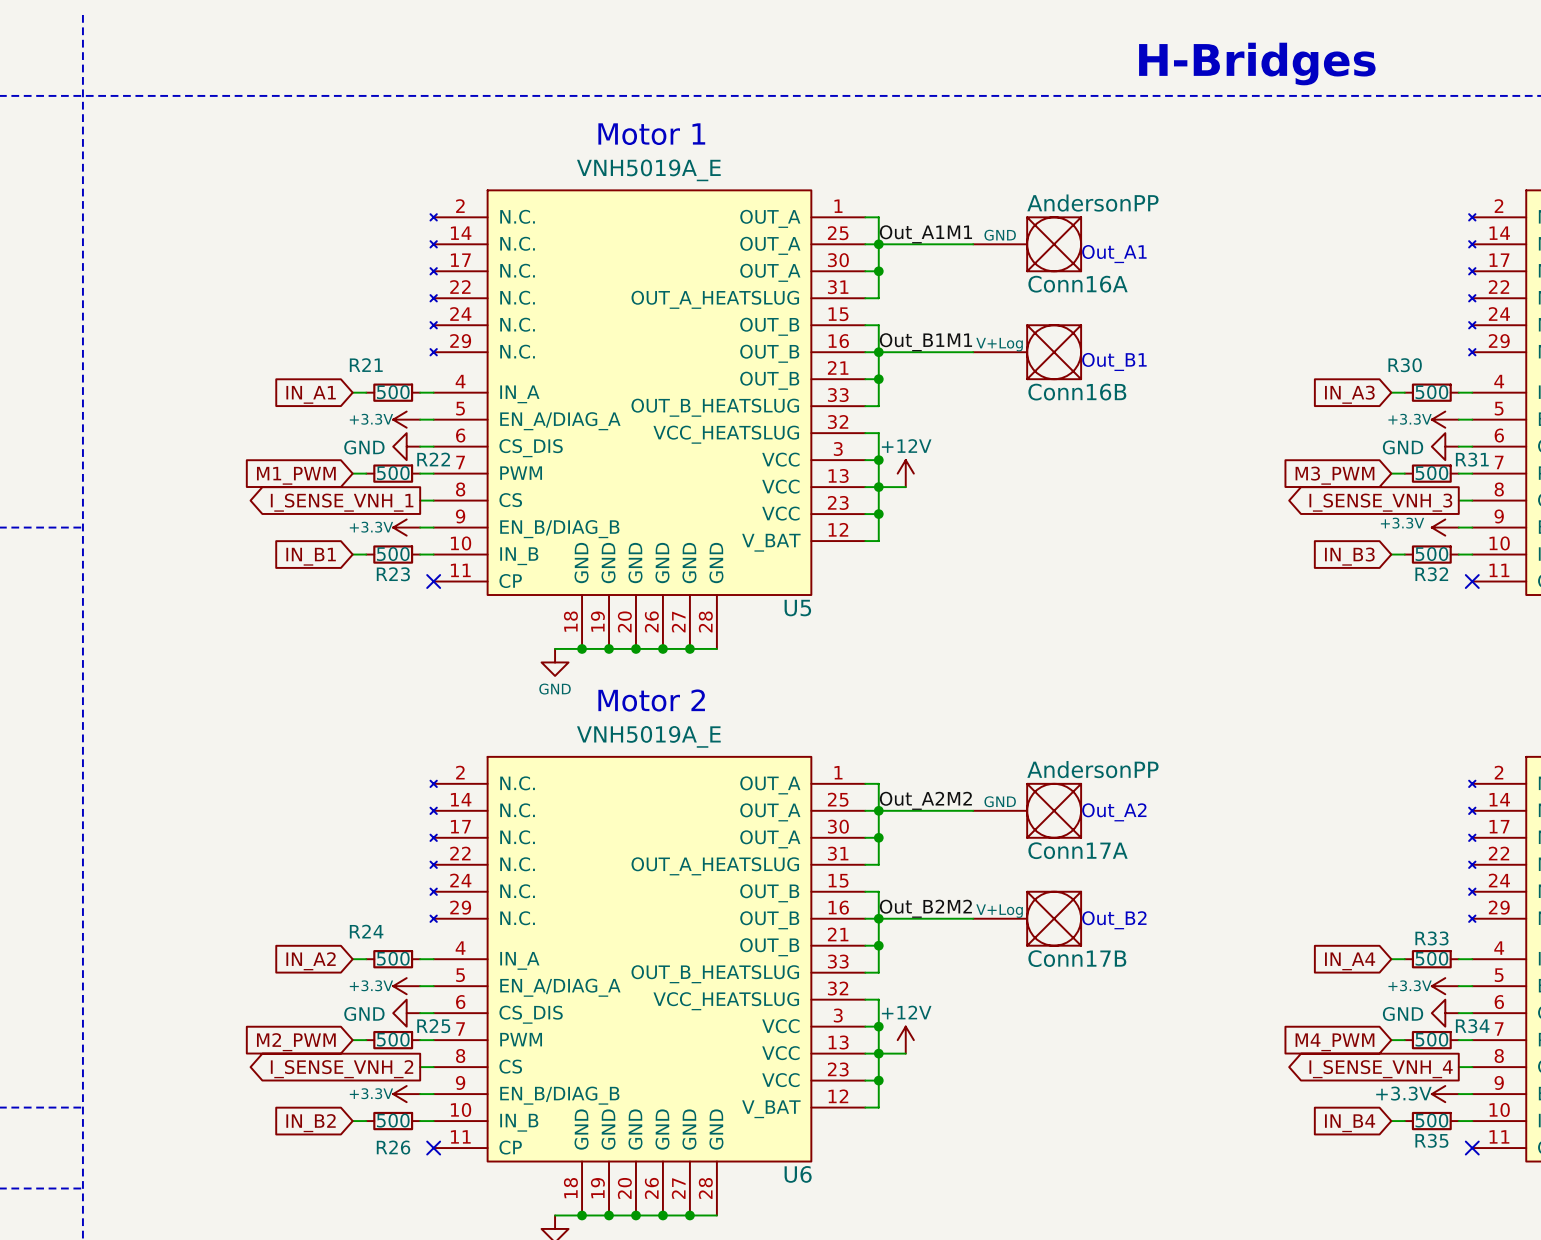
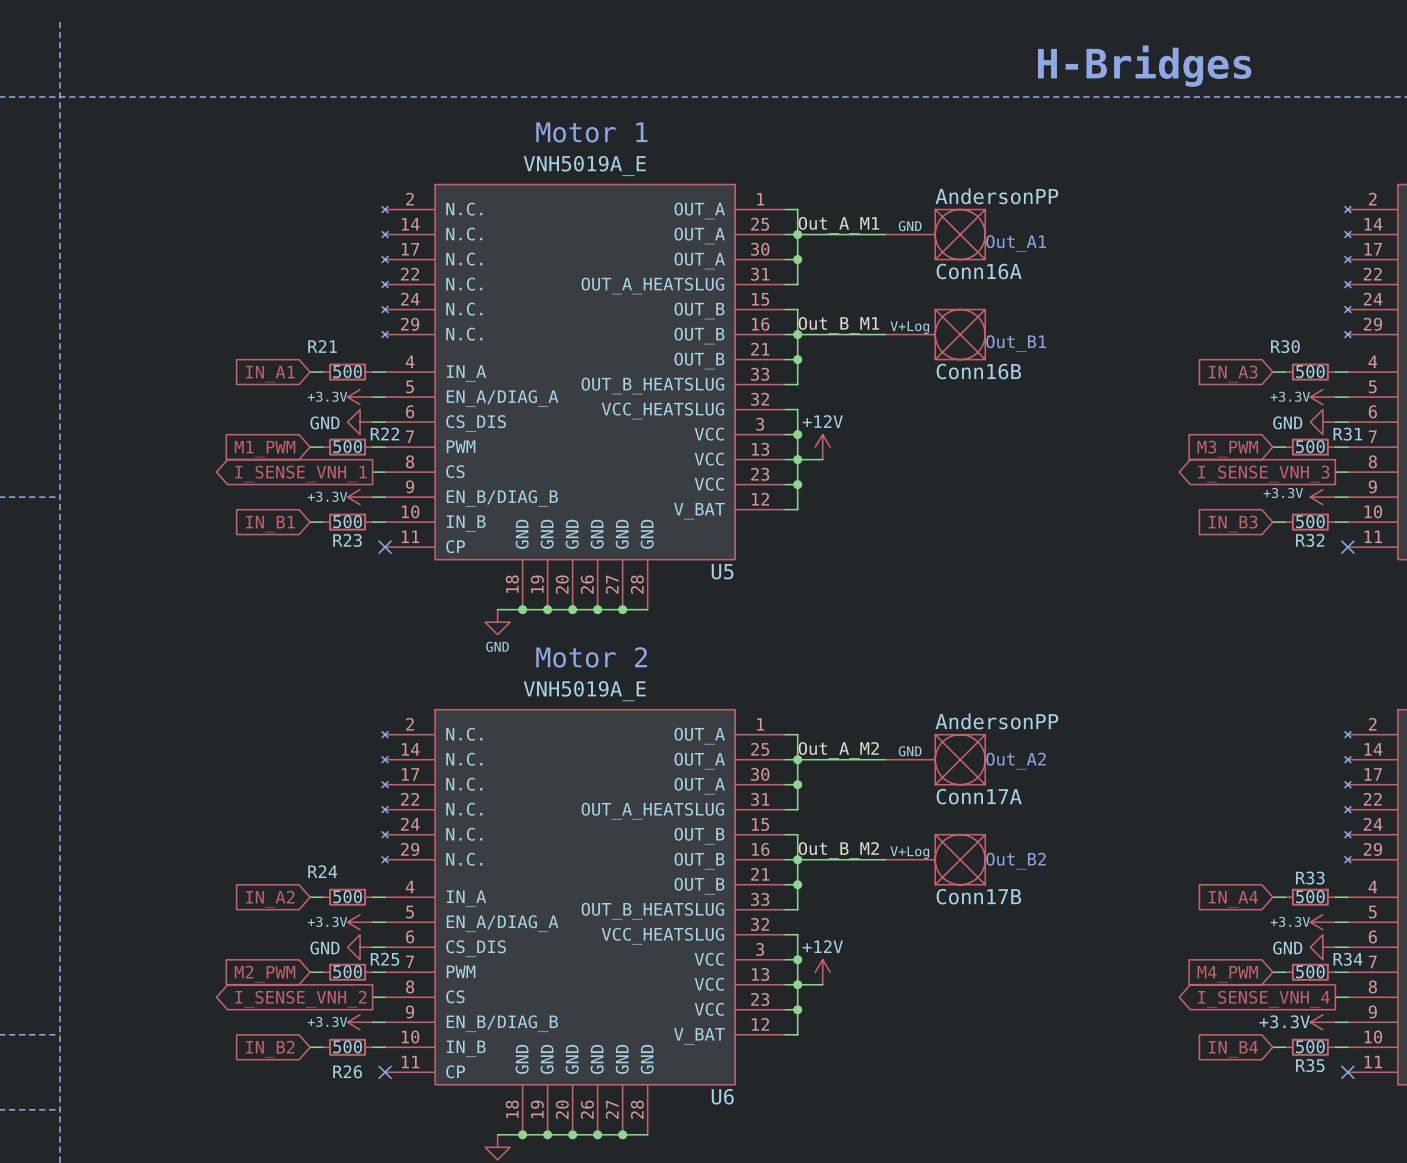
label: Out_A1M1 (925, 234) -> Out_A_M1 (838, 225)
label: Out_B1M1 (925, 342) -> Out_B_M1 (838, 325)
label: Out_A2M2 (925, 800) -> Out_A_M2 (838, 750)
label: Out_B2M2 (925, 908) -> Out_B_M2 (838, 850)

